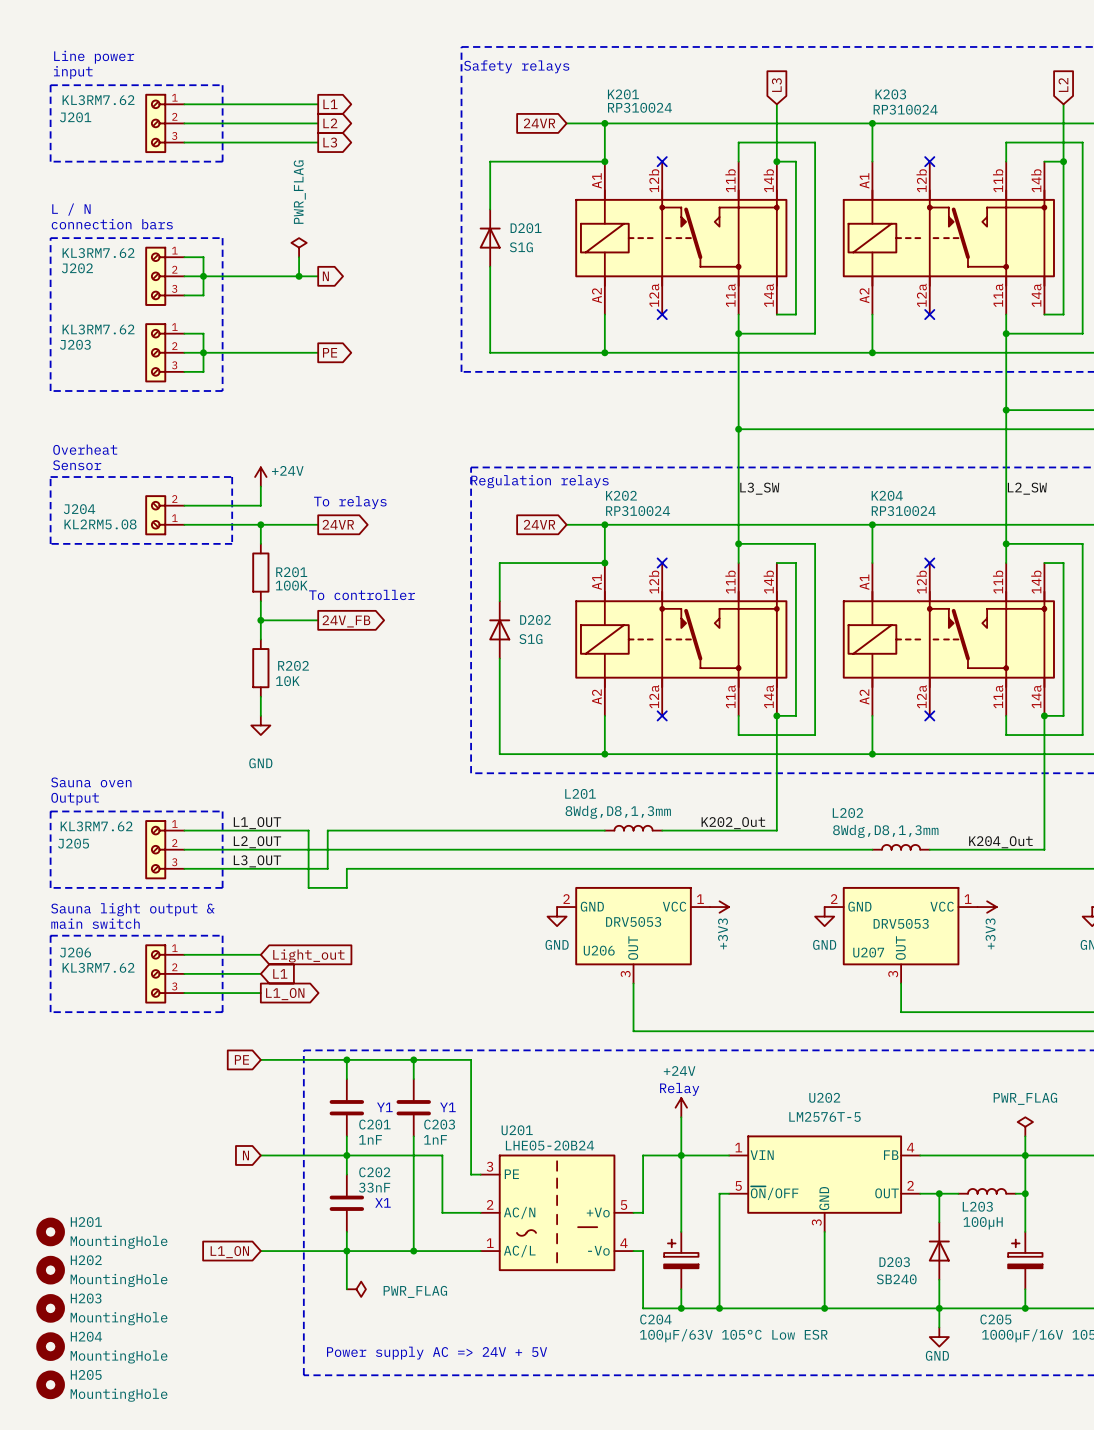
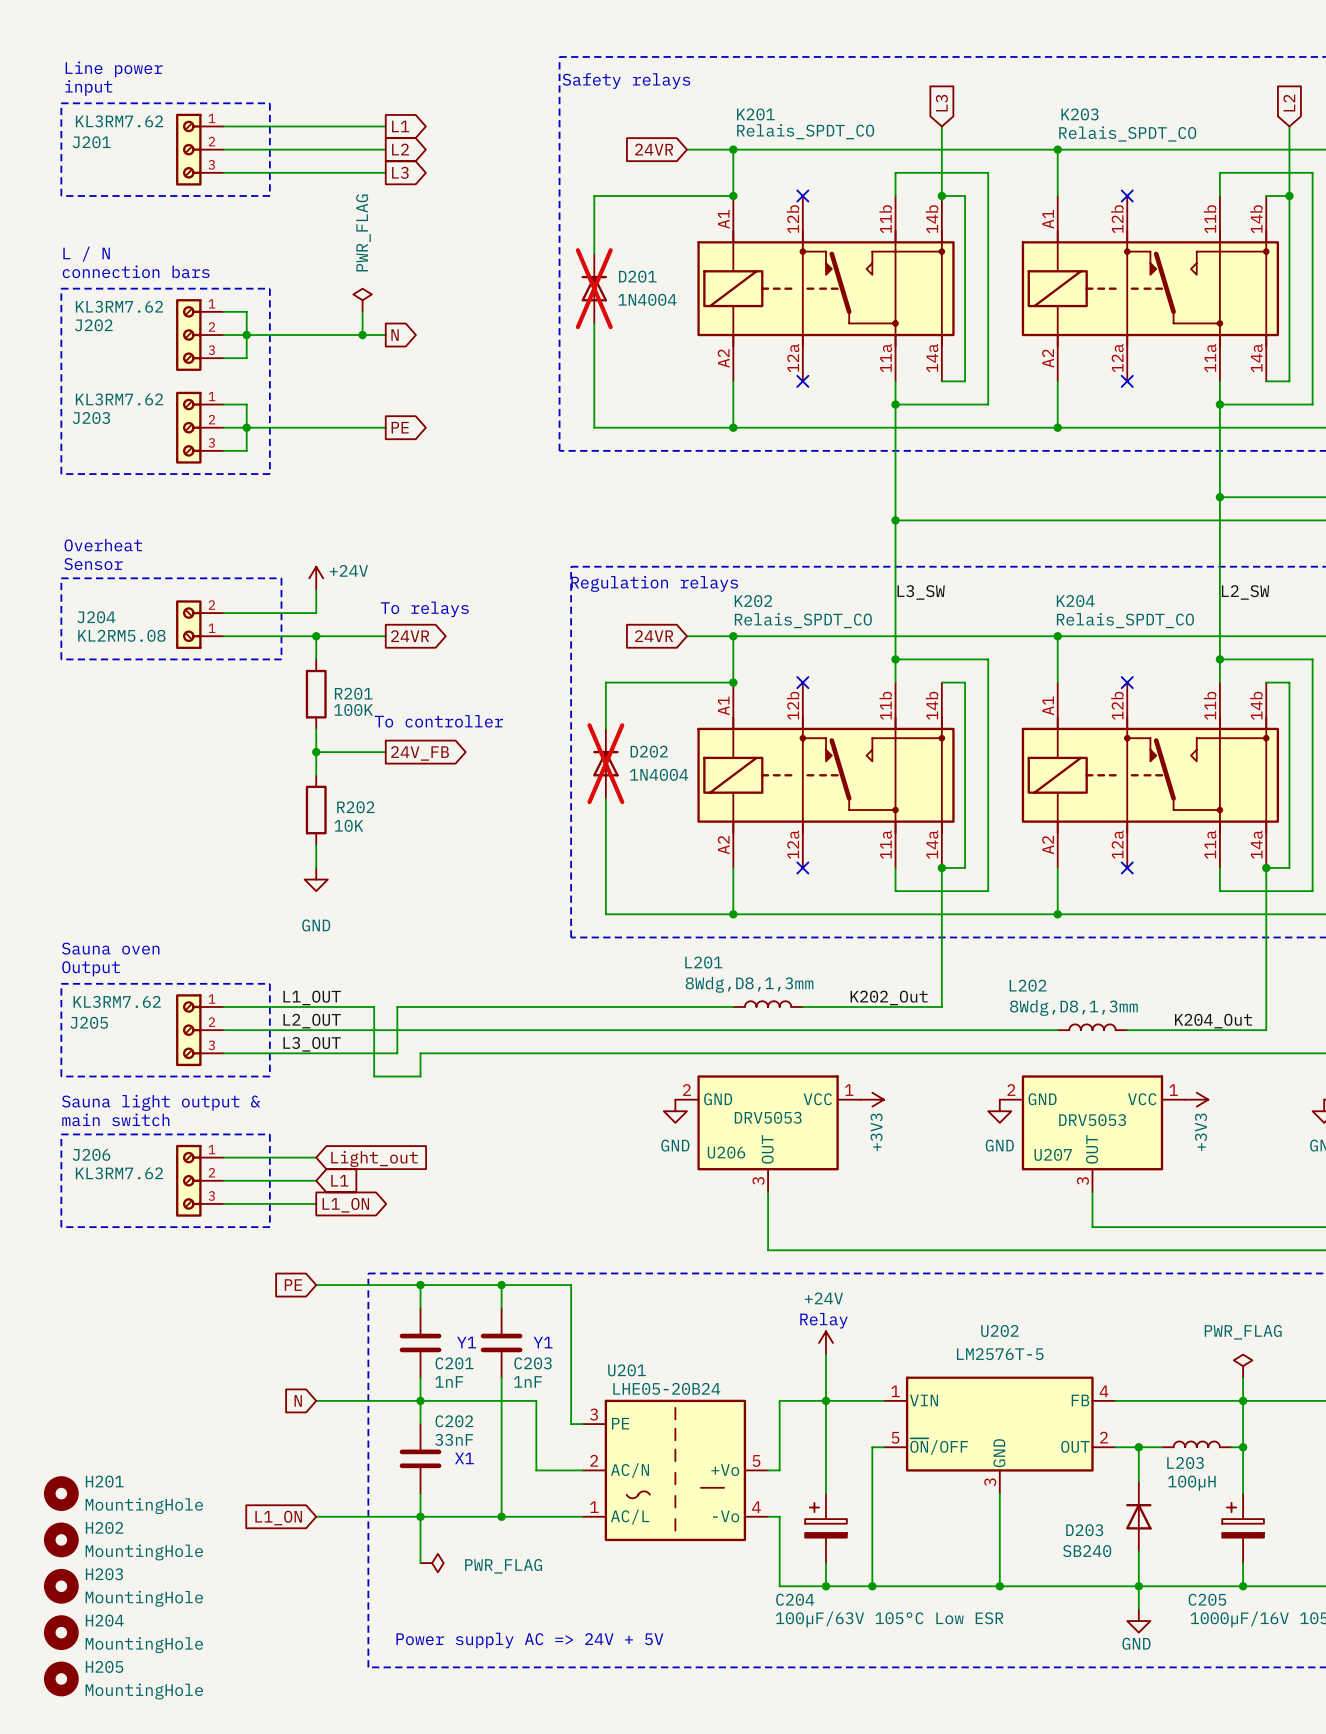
K201 value: RP310024 (639, 107) -> Relais_SPDT_CO (805, 131)
K203 value: RP310024 (905, 109) -> Relais_SPDT_CO (1127, 133)
D201 do-not-place cross: none -> (594, 288)
D201 value: S1G (521, 247) -> 1N4004 (647, 299)
K202 value: RP310024 (638, 511) -> Relais_SPDT_CO (803, 620)
K204 value: RP310024 (903, 511) -> Relais_SPDT_CO (1125, 620)
D202 do-not-place cross: none -> (605, 763)
D202 value: S1G (530, 639) -> 1N4004 (659, 774)

